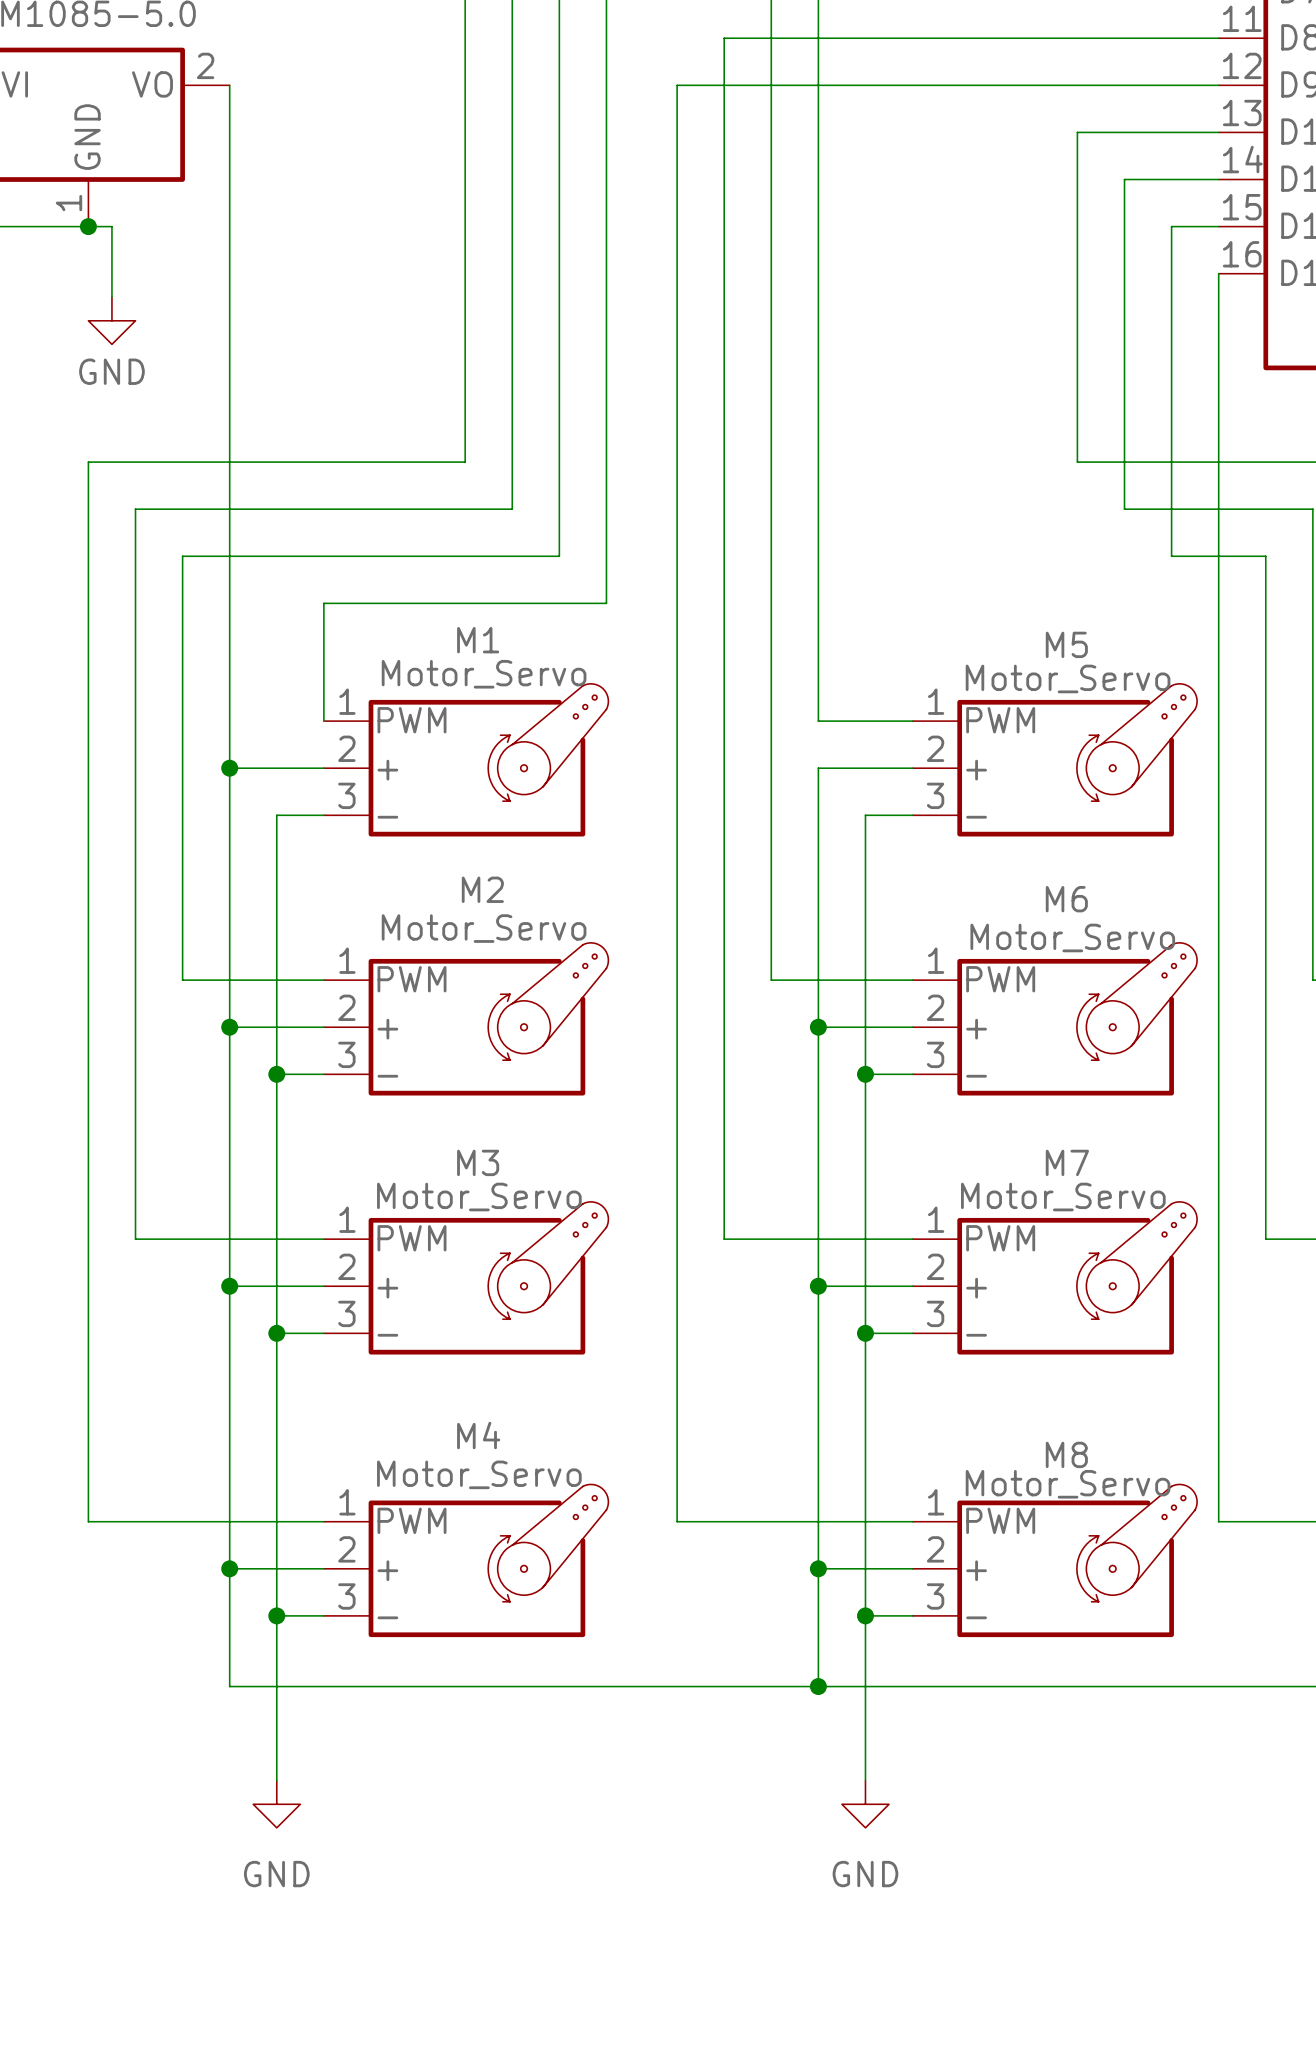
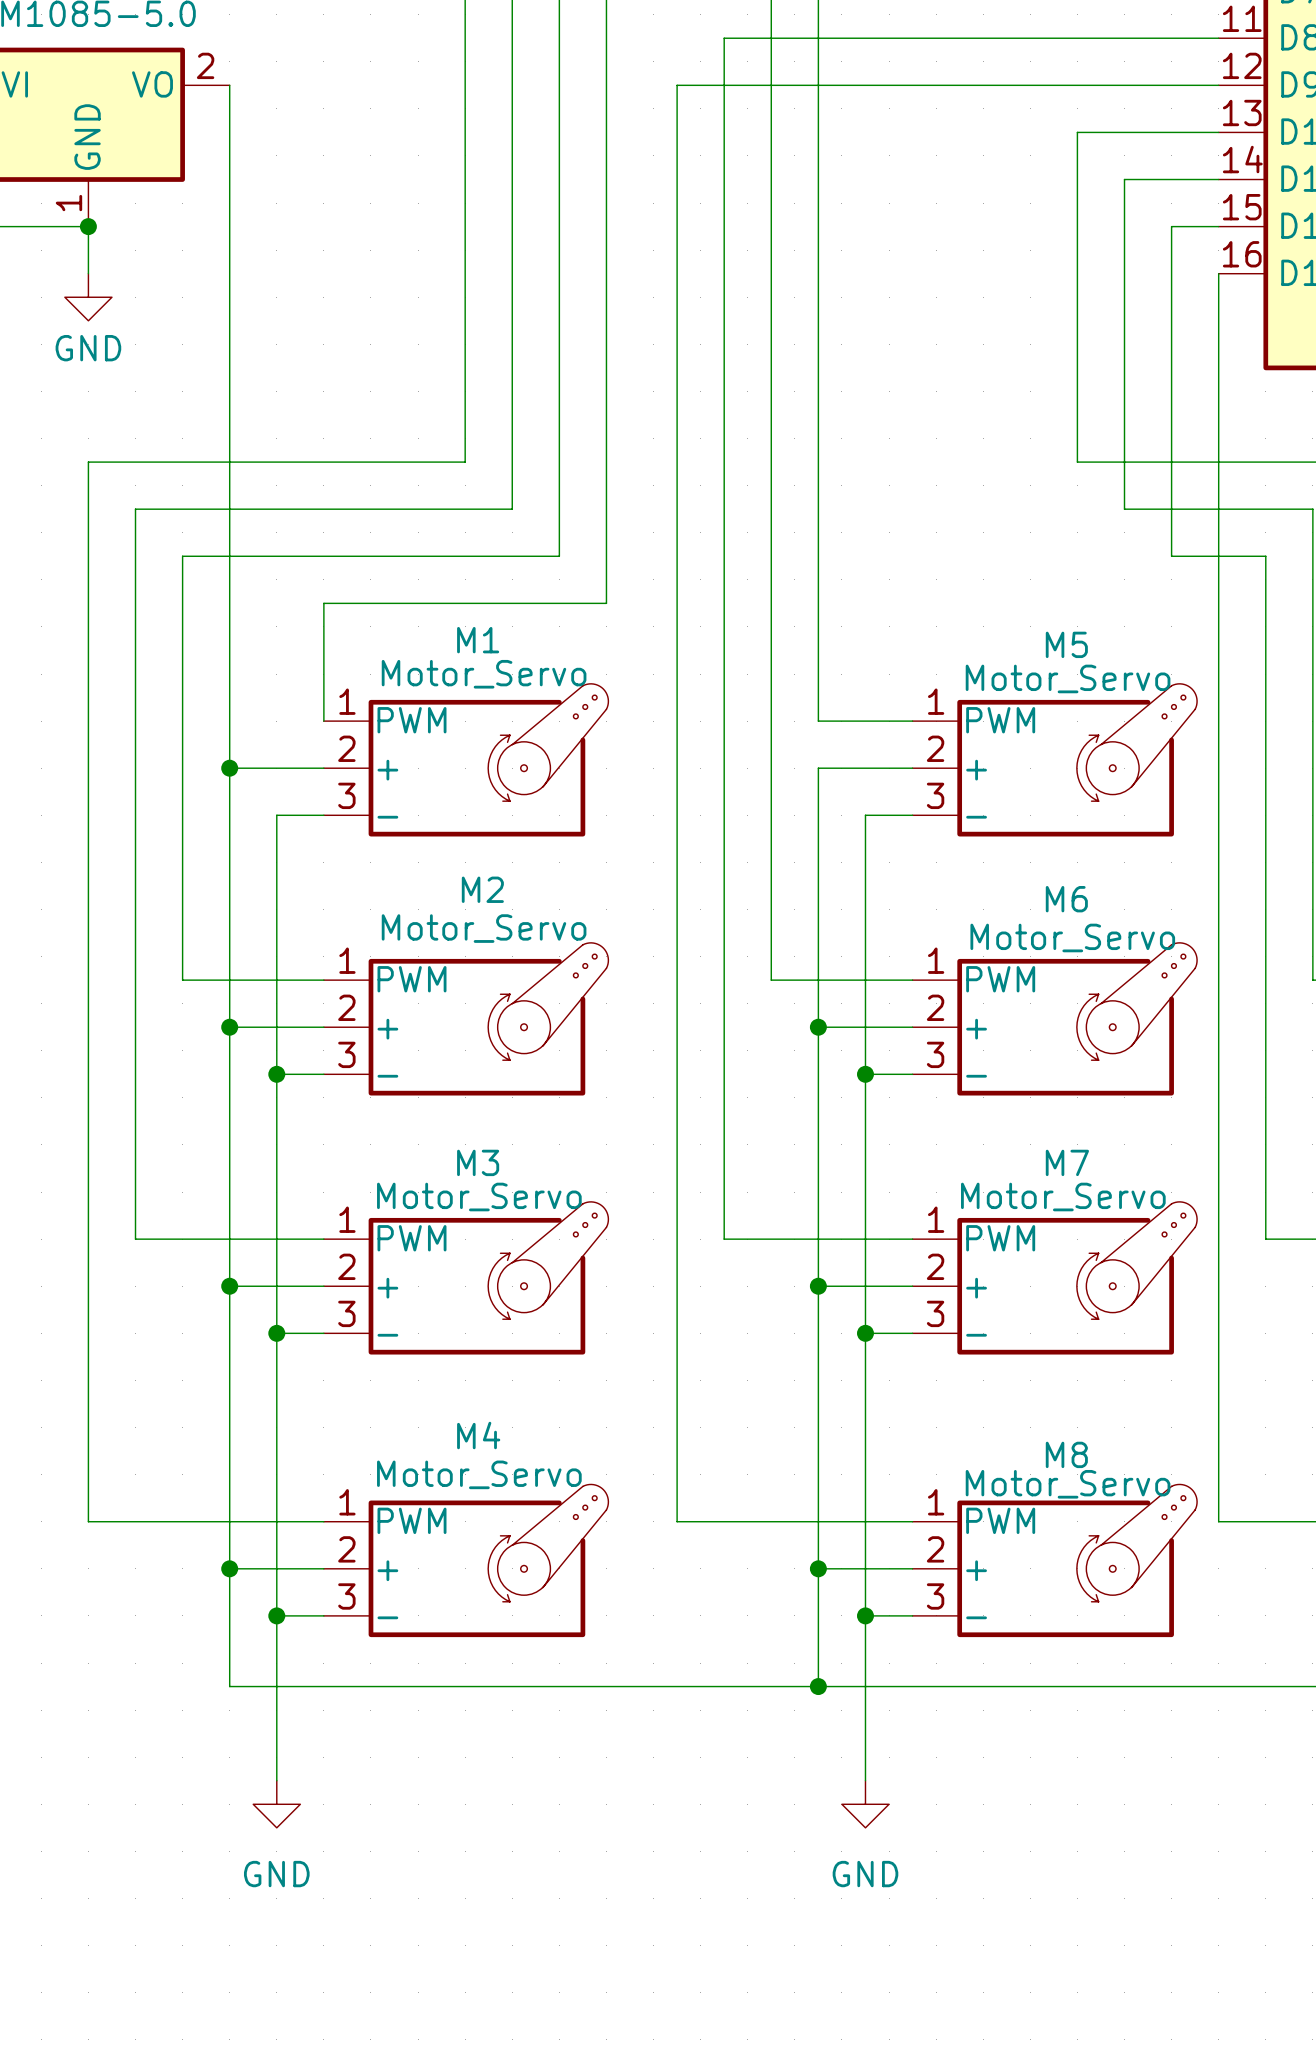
wire: (88, 226) (111, 226) (111, 297) -> (88, 226) (88, 273)
power symbol position: GND (111, 320) -> GND (88, 297)

